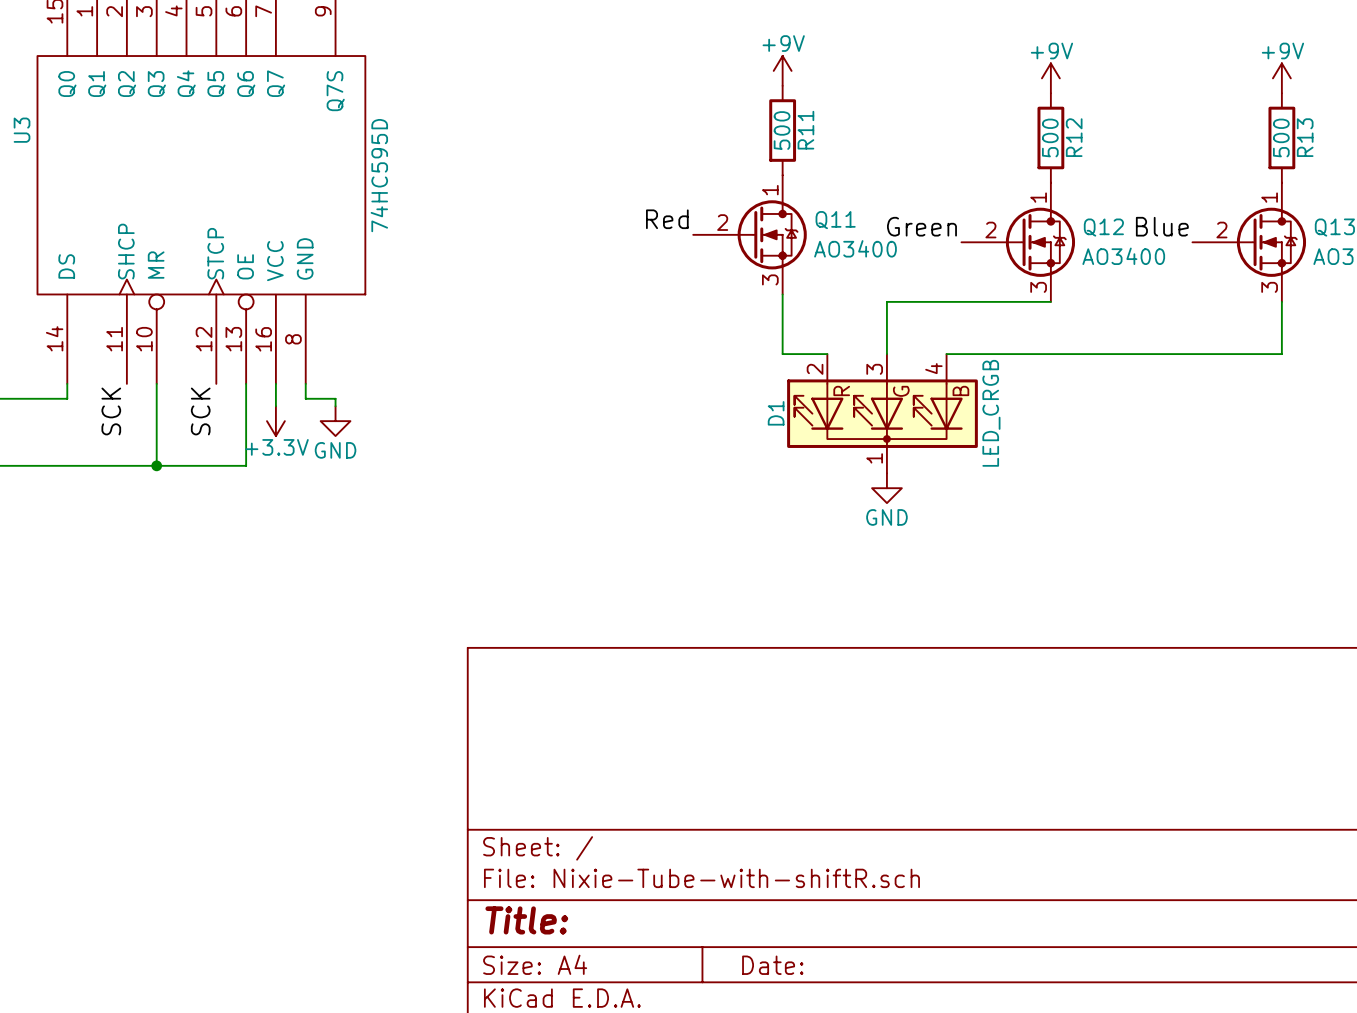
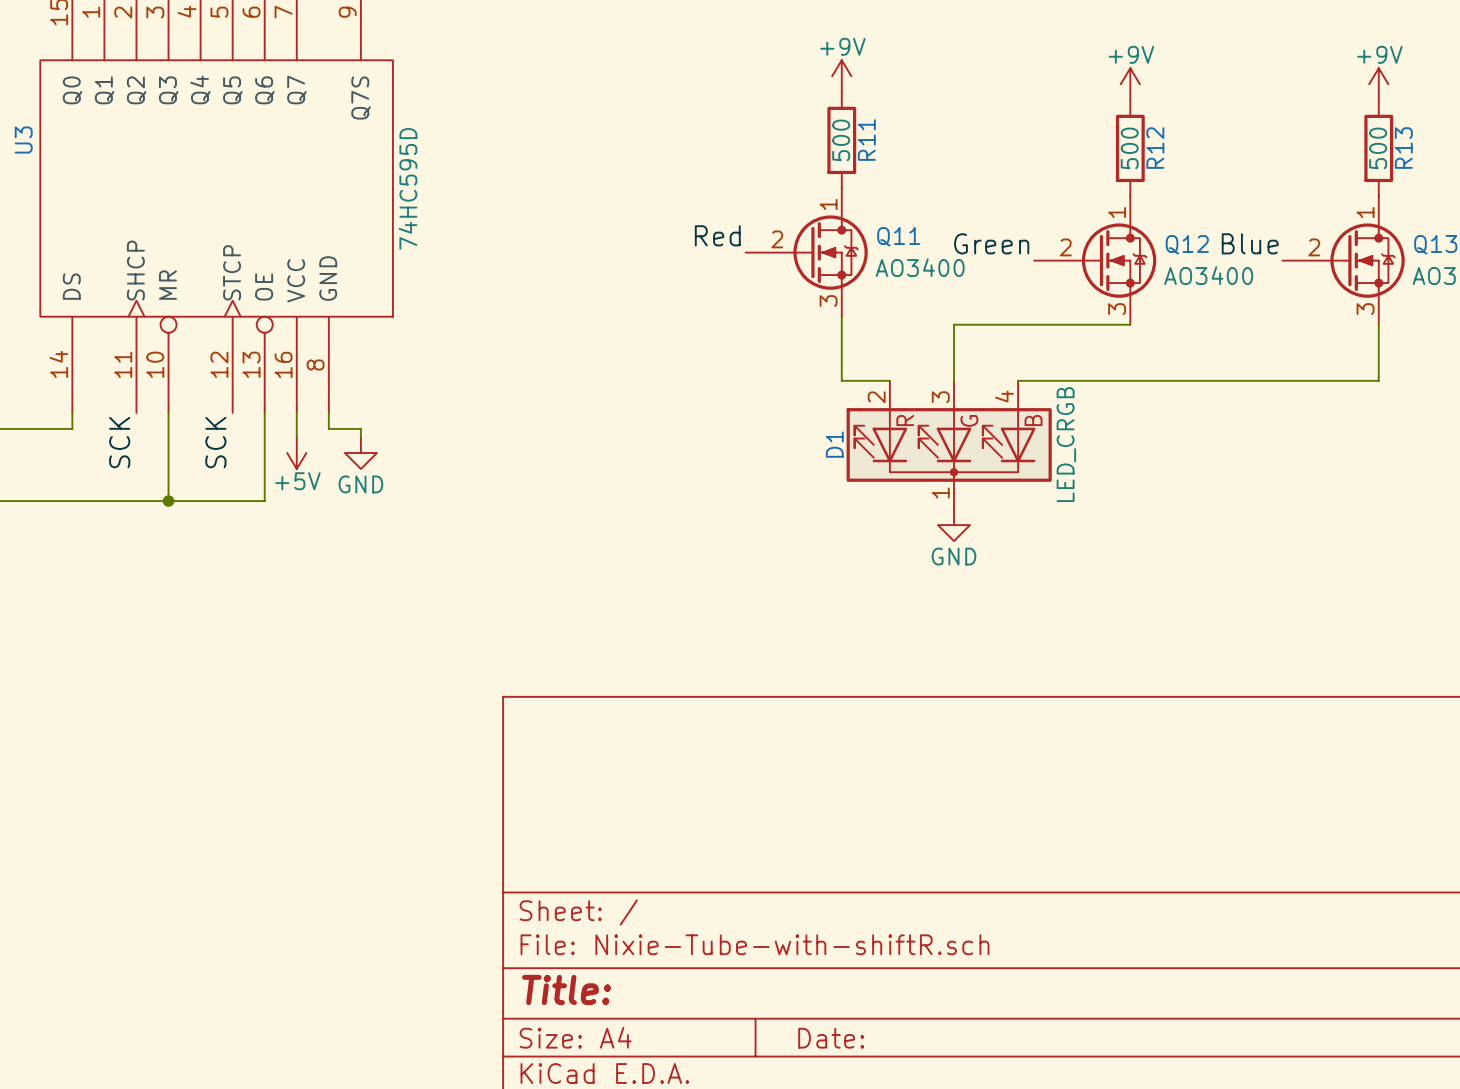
power symbol: +3.3V (275, 421) -> +5V (296, 452)

